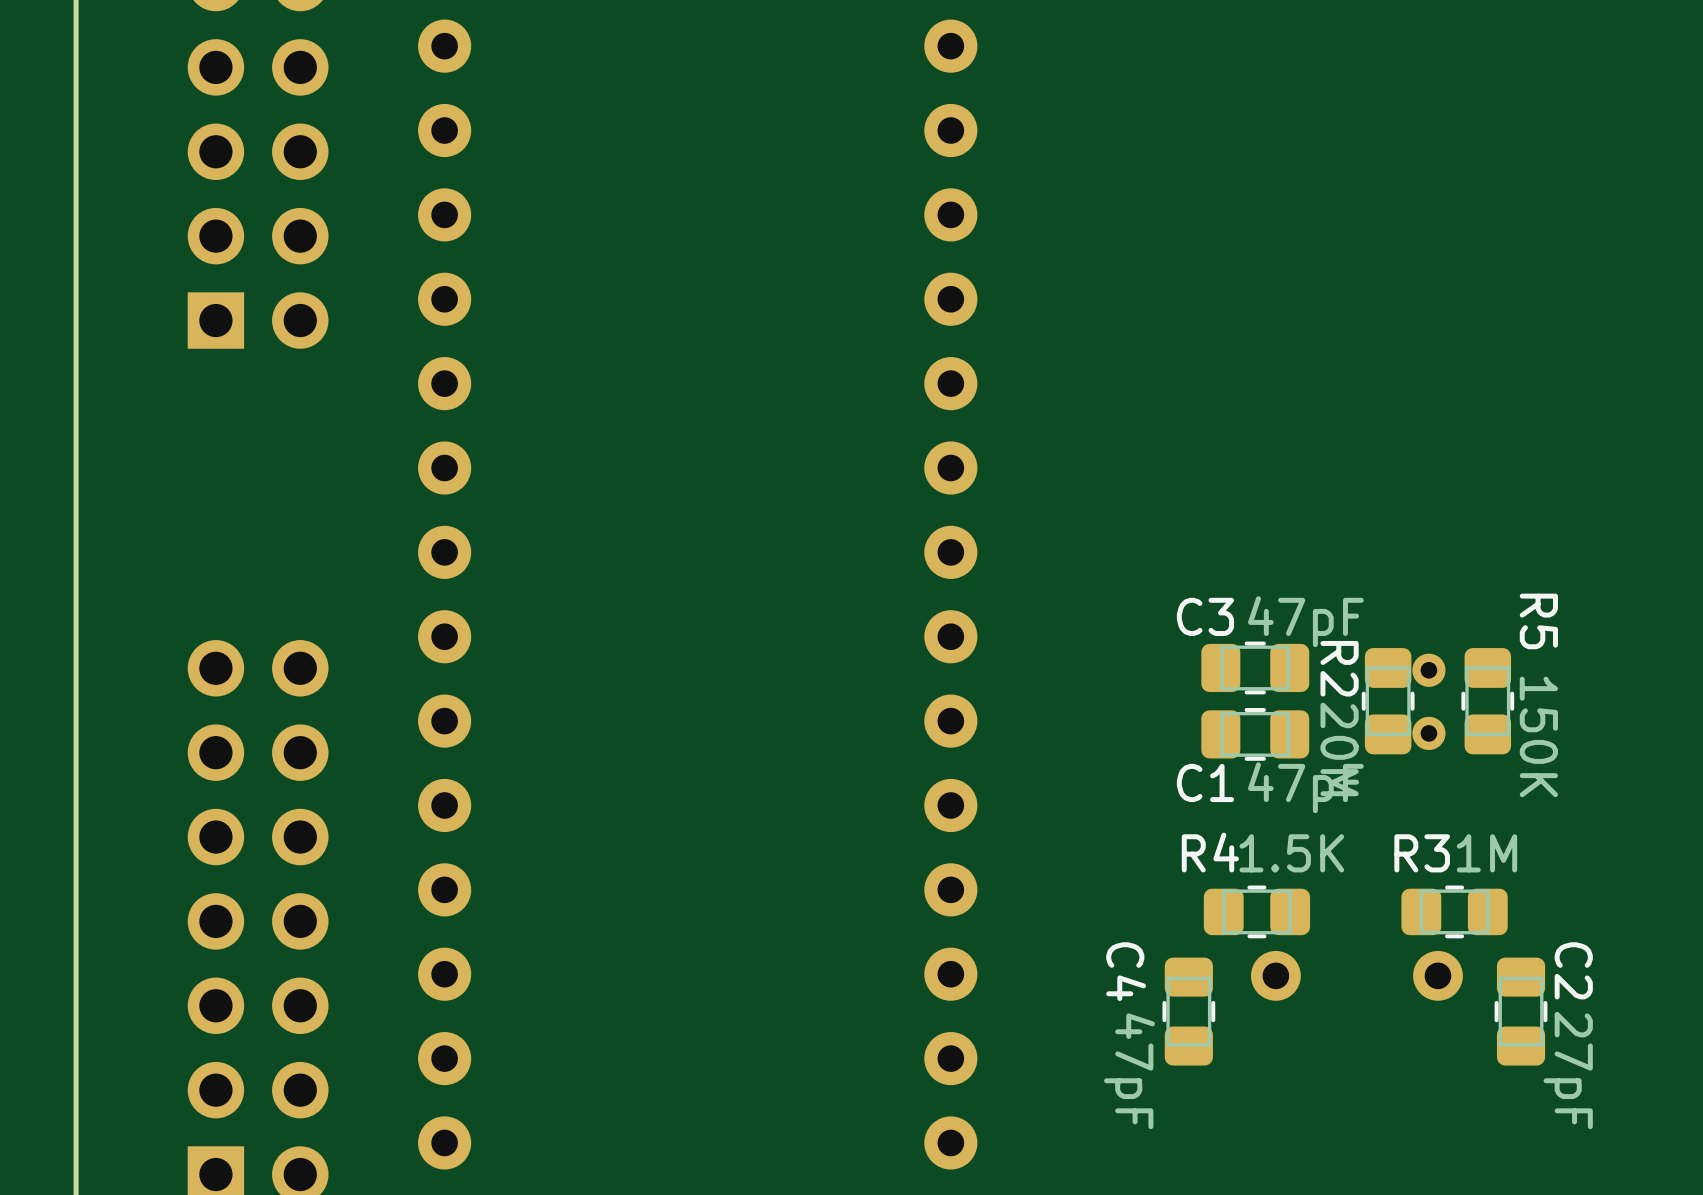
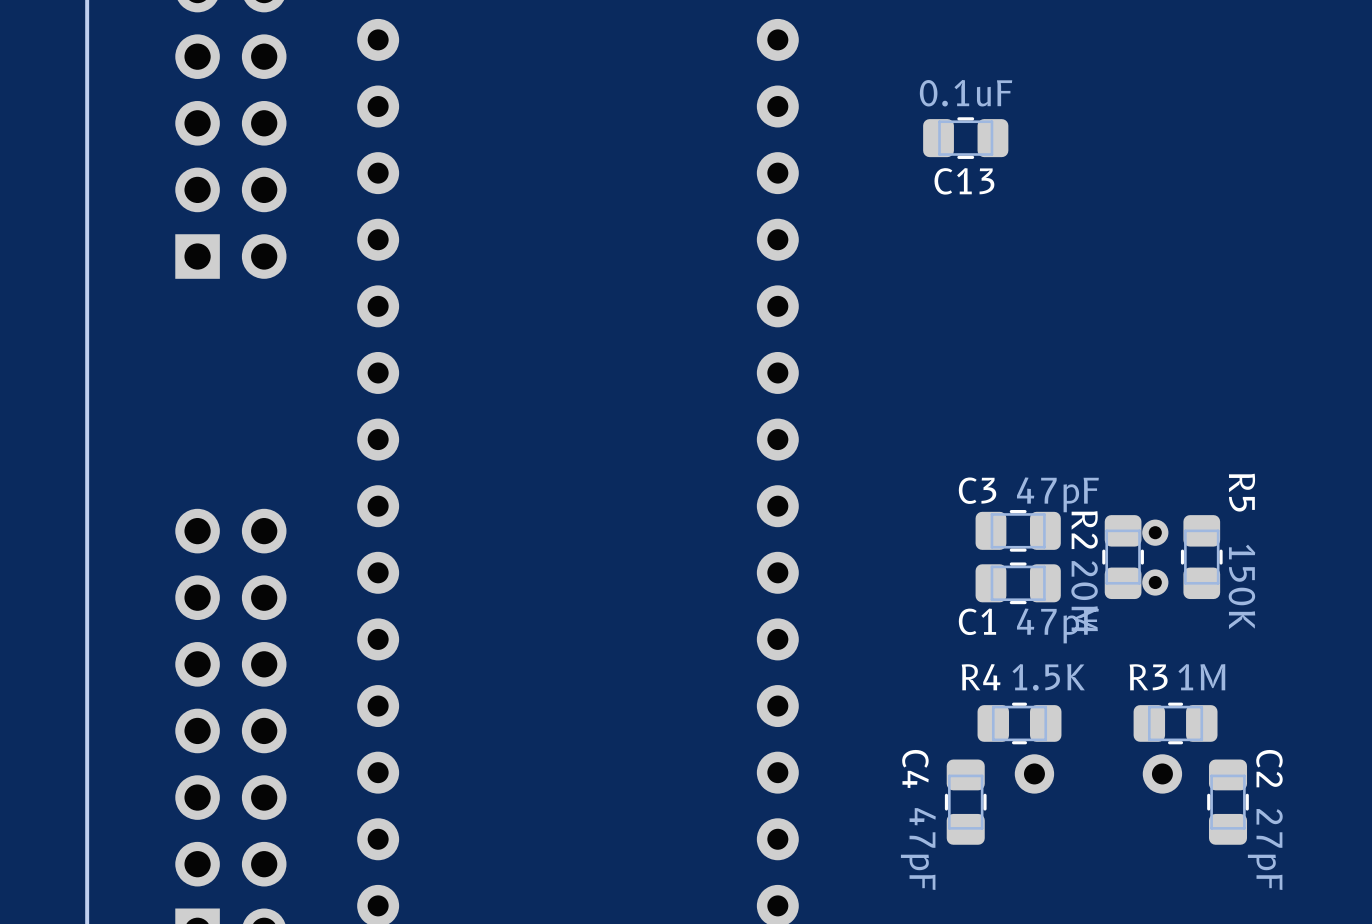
C13: none -> 0.1uF (965, 138)

